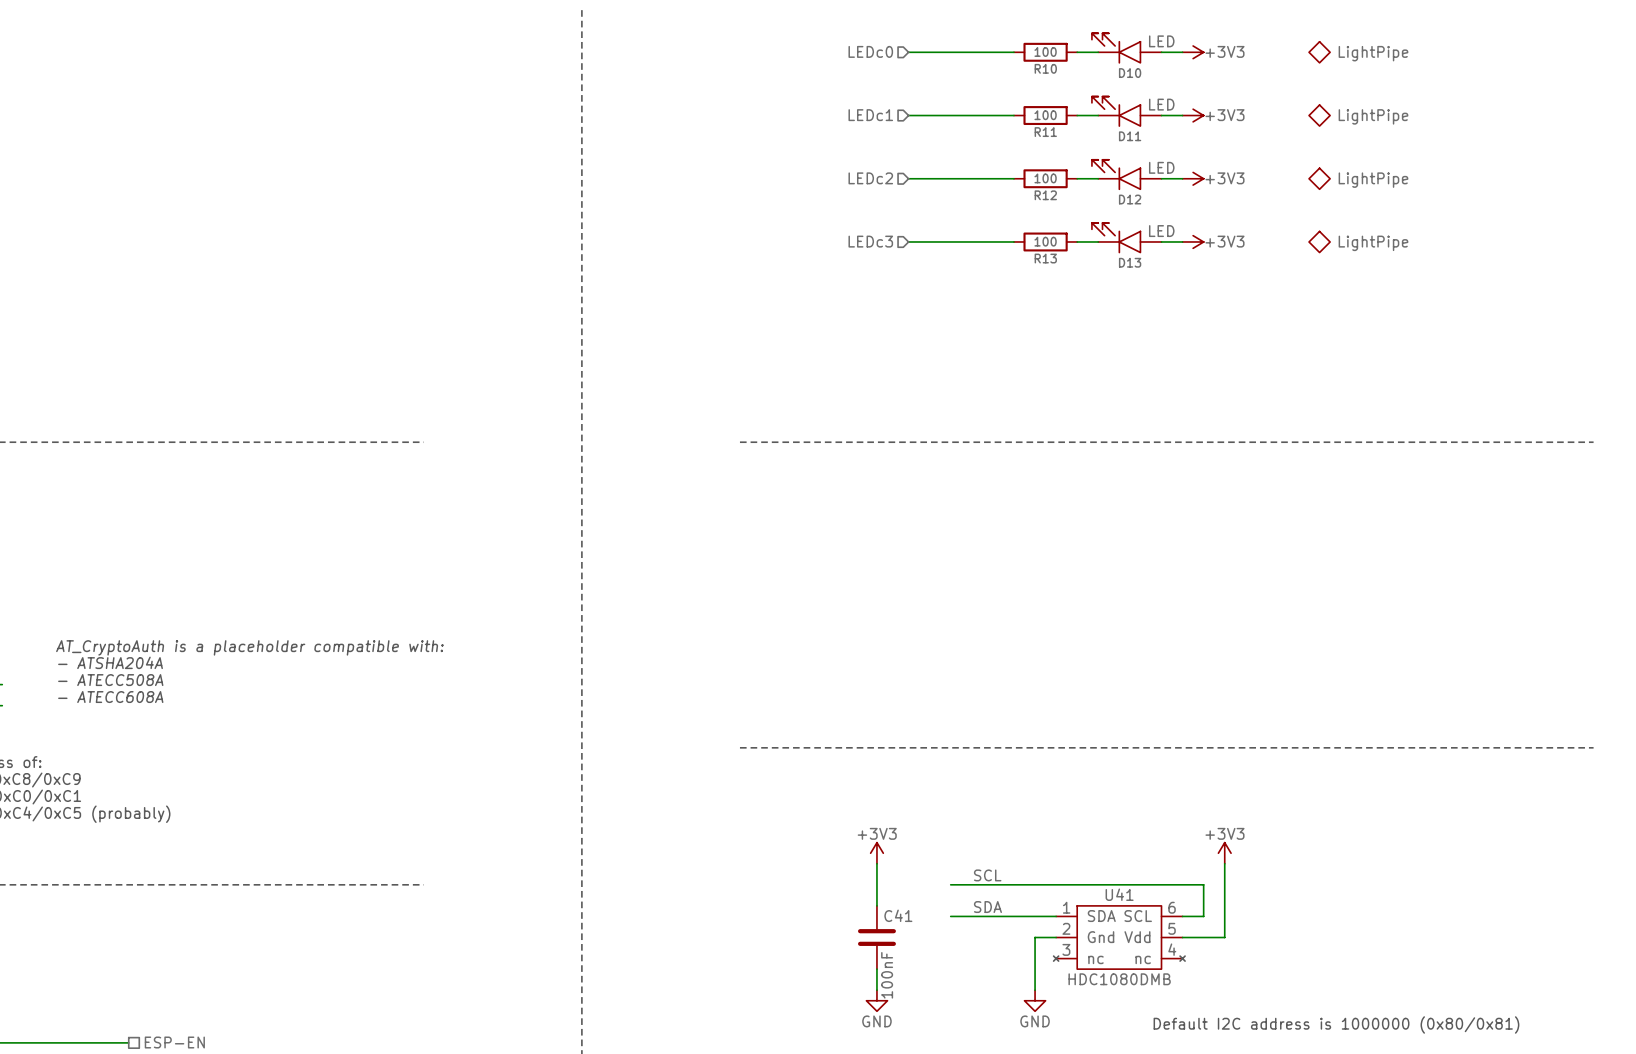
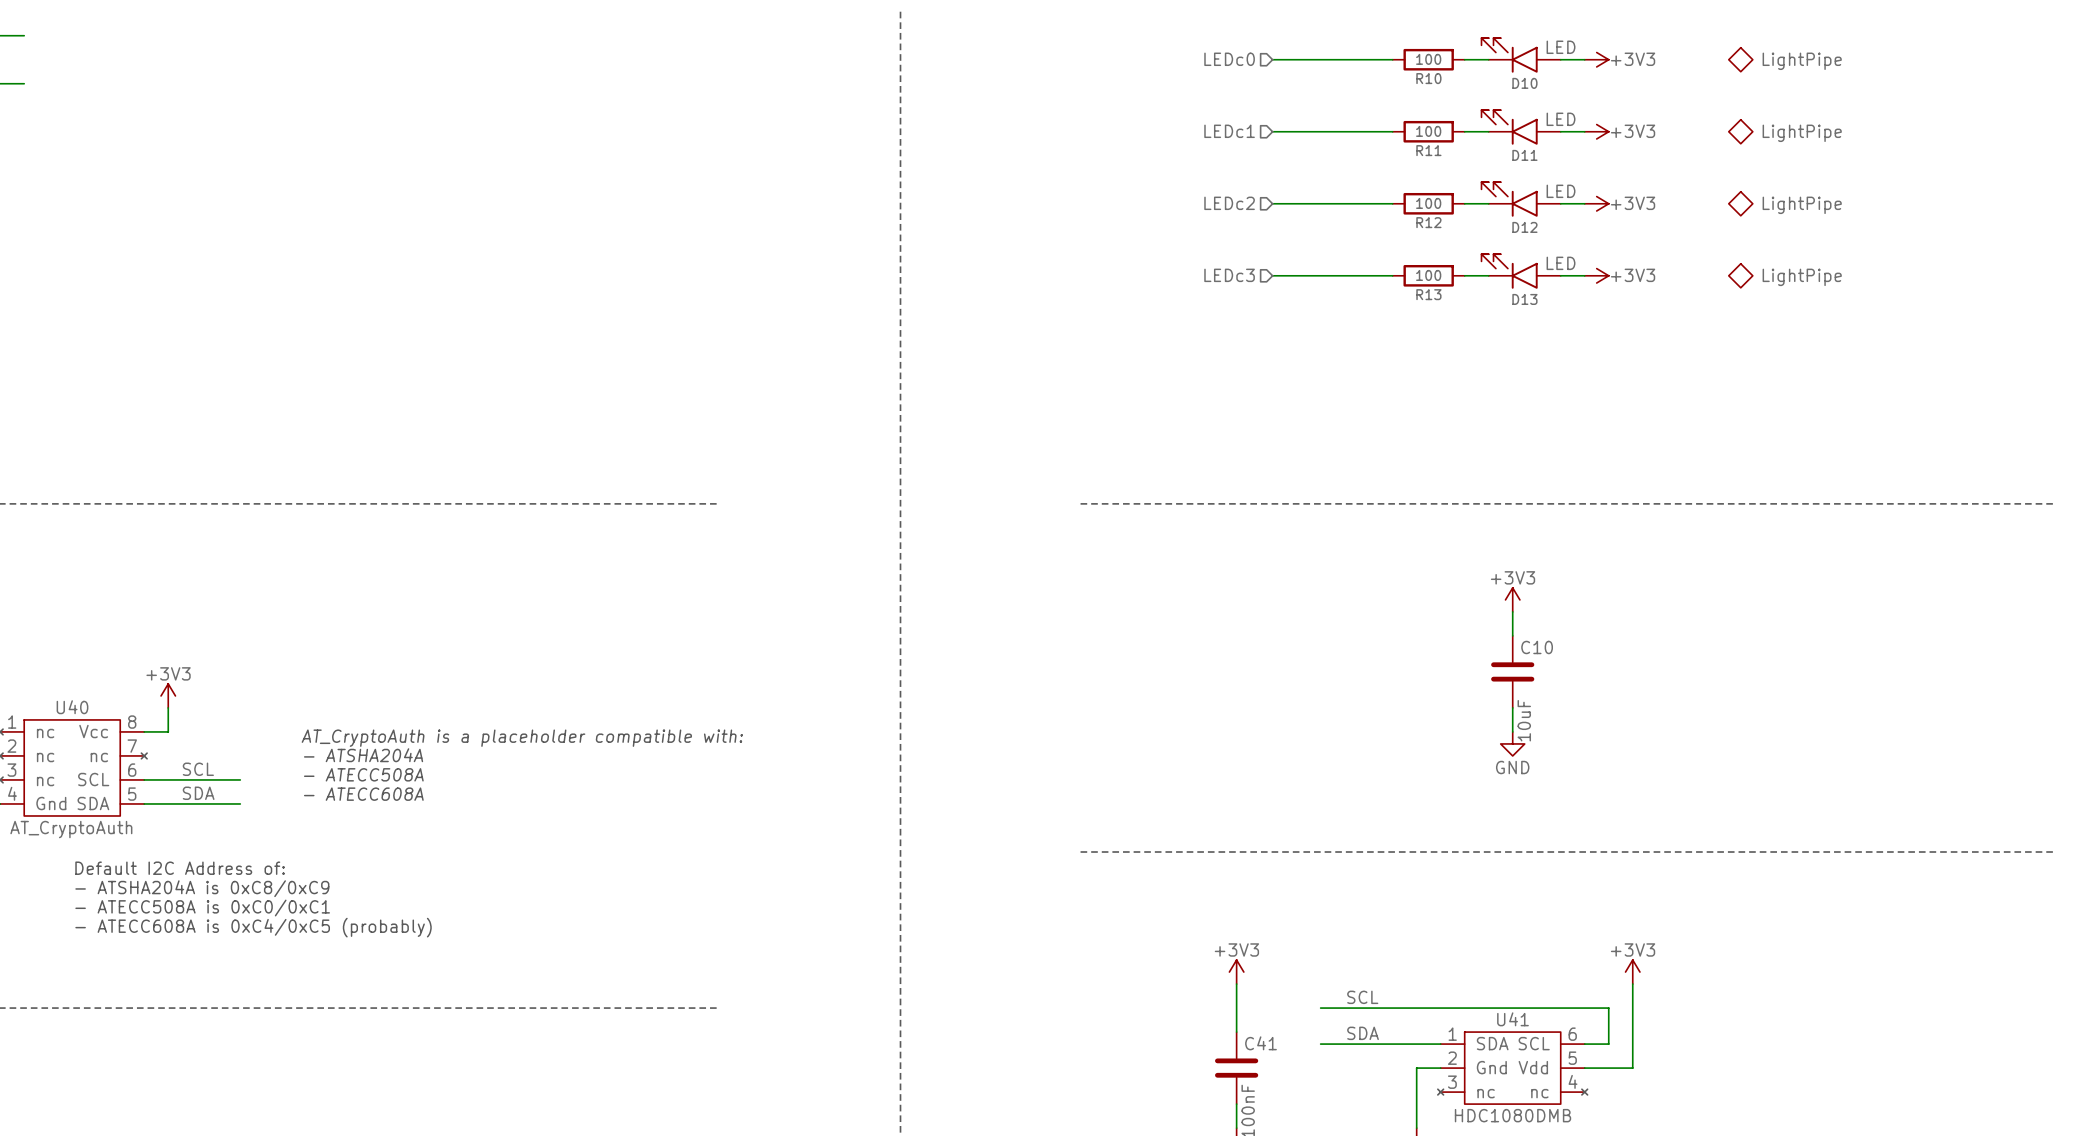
power symbol: none -> +3V3 (1512, 599)
wire: none -> (1512, 611) (1512, 635)
C10: none -> 10uF (1512, 671)
wire: none -> (1512, 707) (1512, 731)
power symbol: none -> GND (1512, 743)

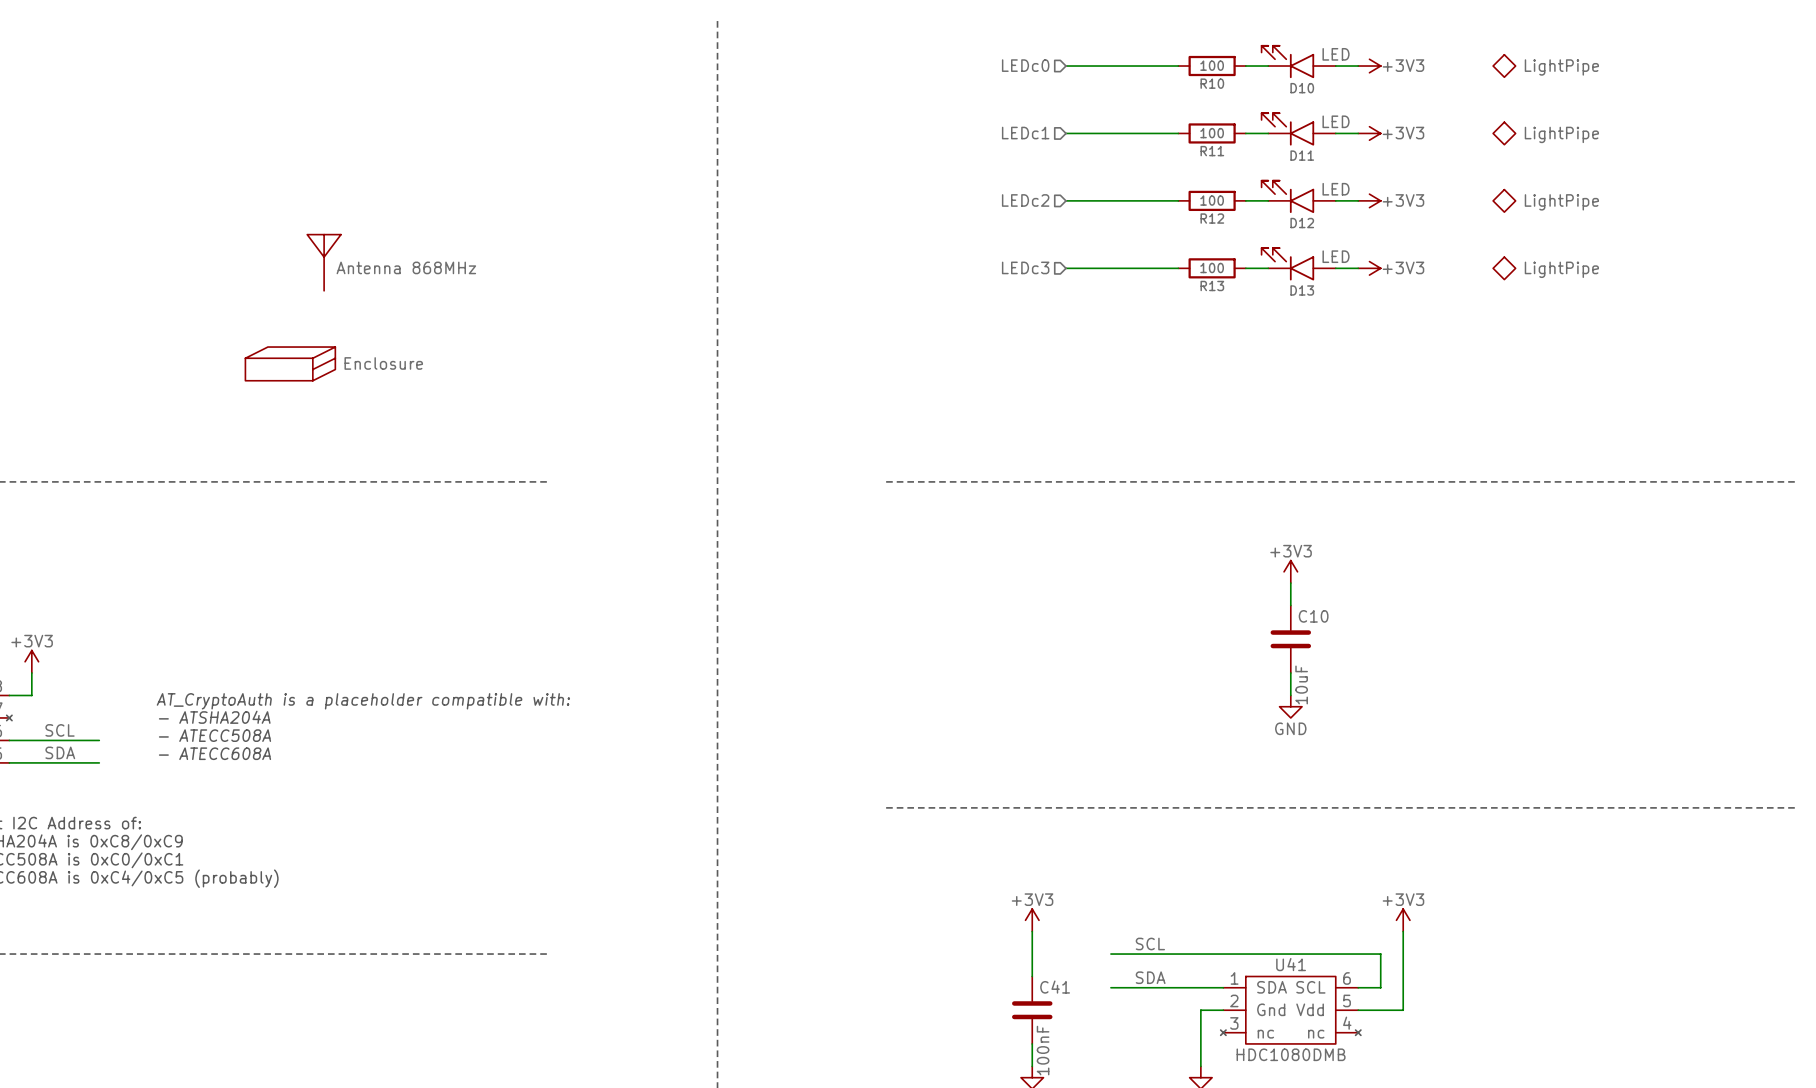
part: none -> Antenna 868MHz (324, 262)
part: none -> Enclosure (290, 363)

